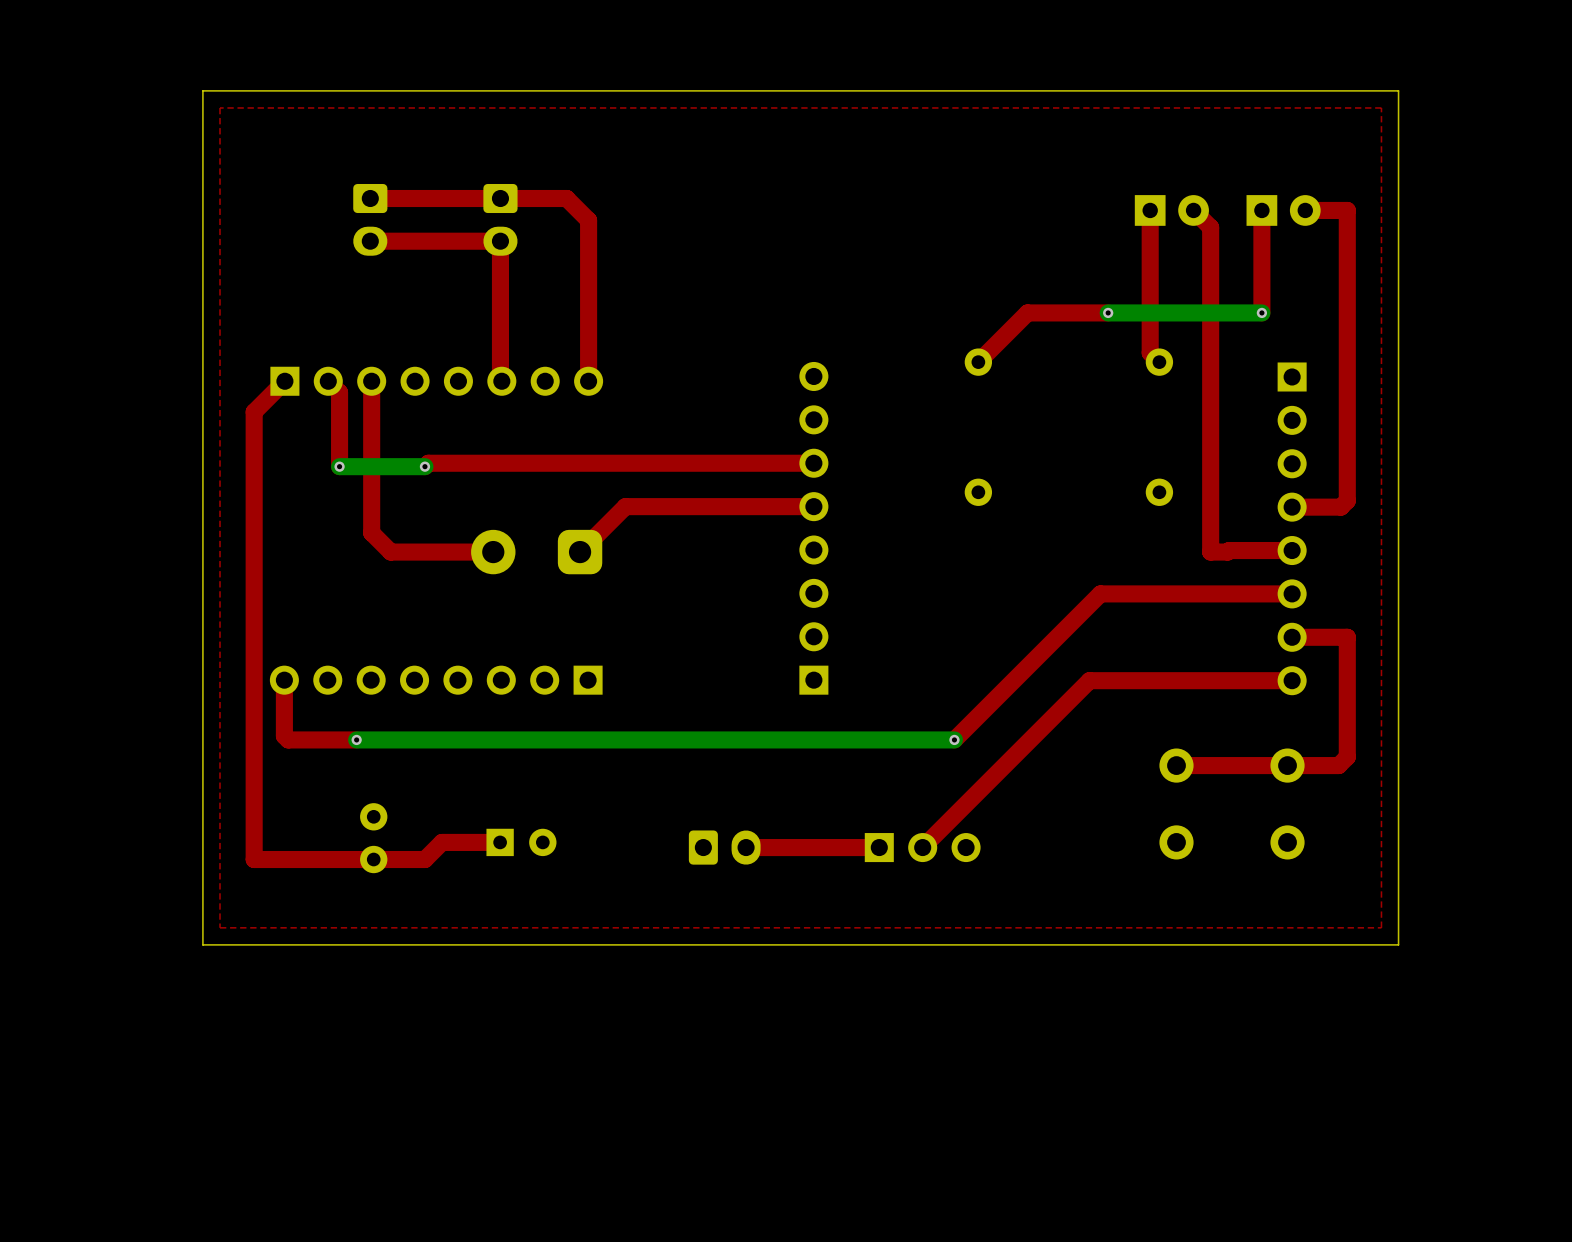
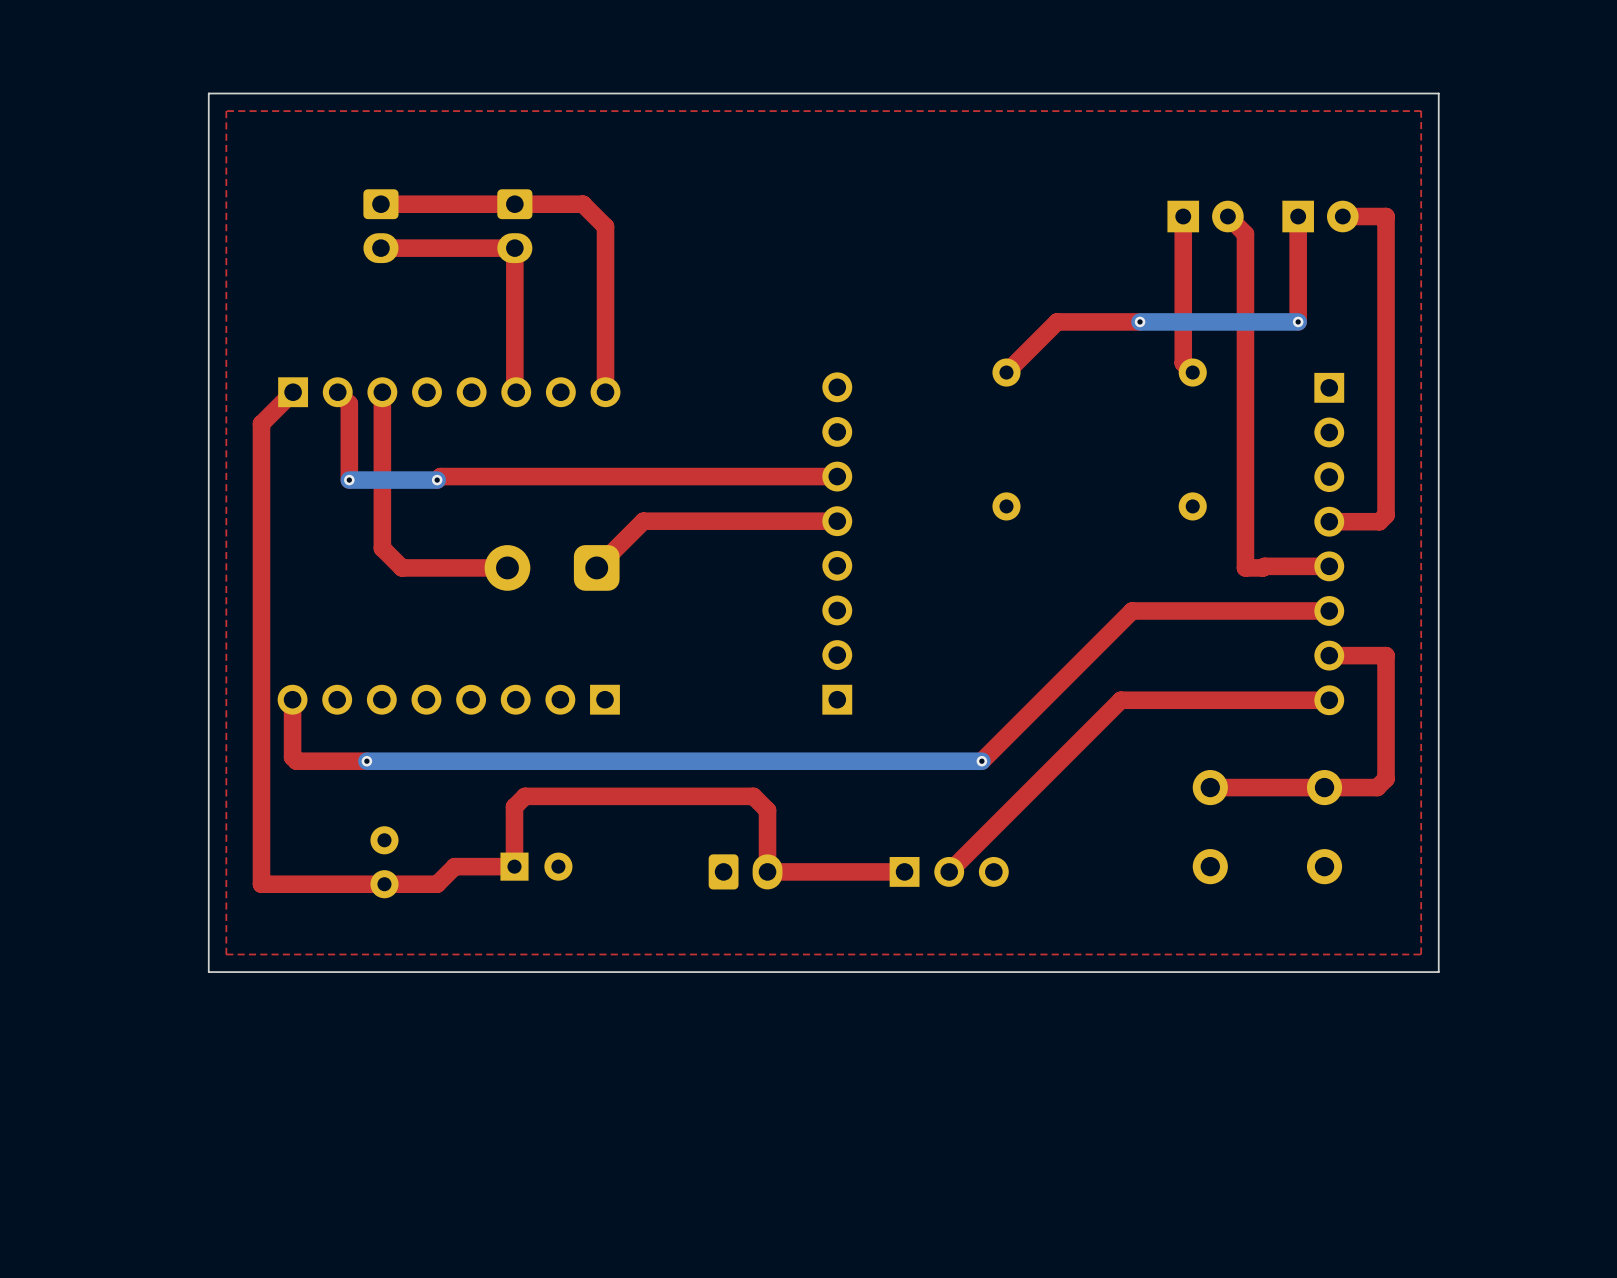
top track: none -> (514, 866) (514, 806) (525, 796) (753, 796) (767, 810) (767, 871)

